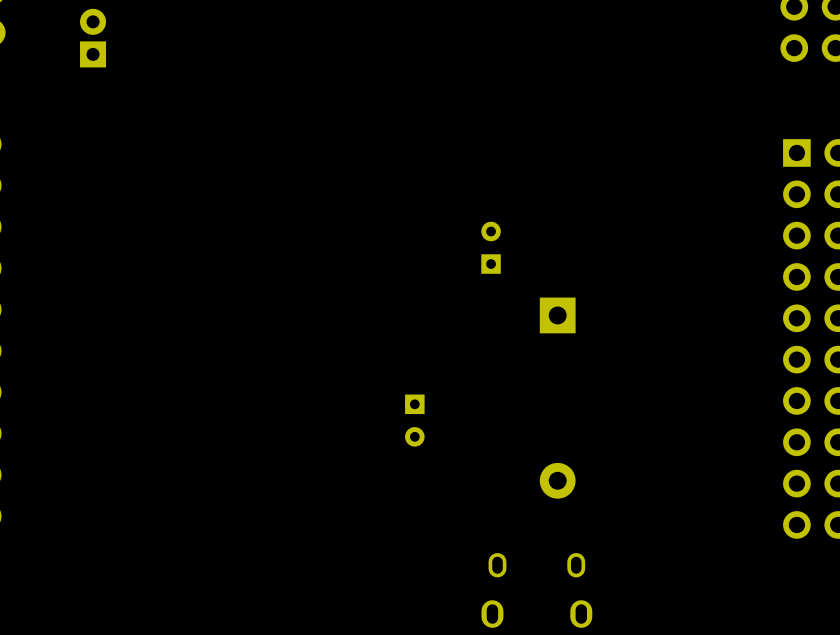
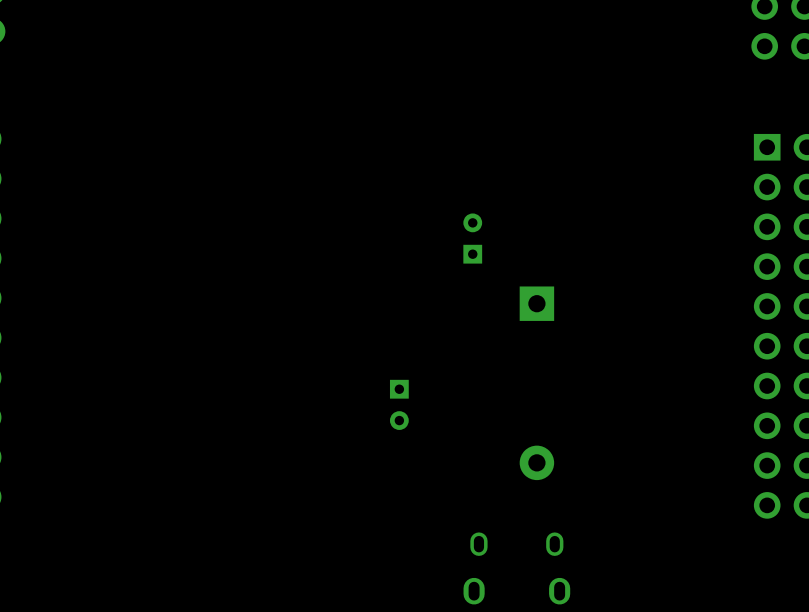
part: (93, 38) -> none

